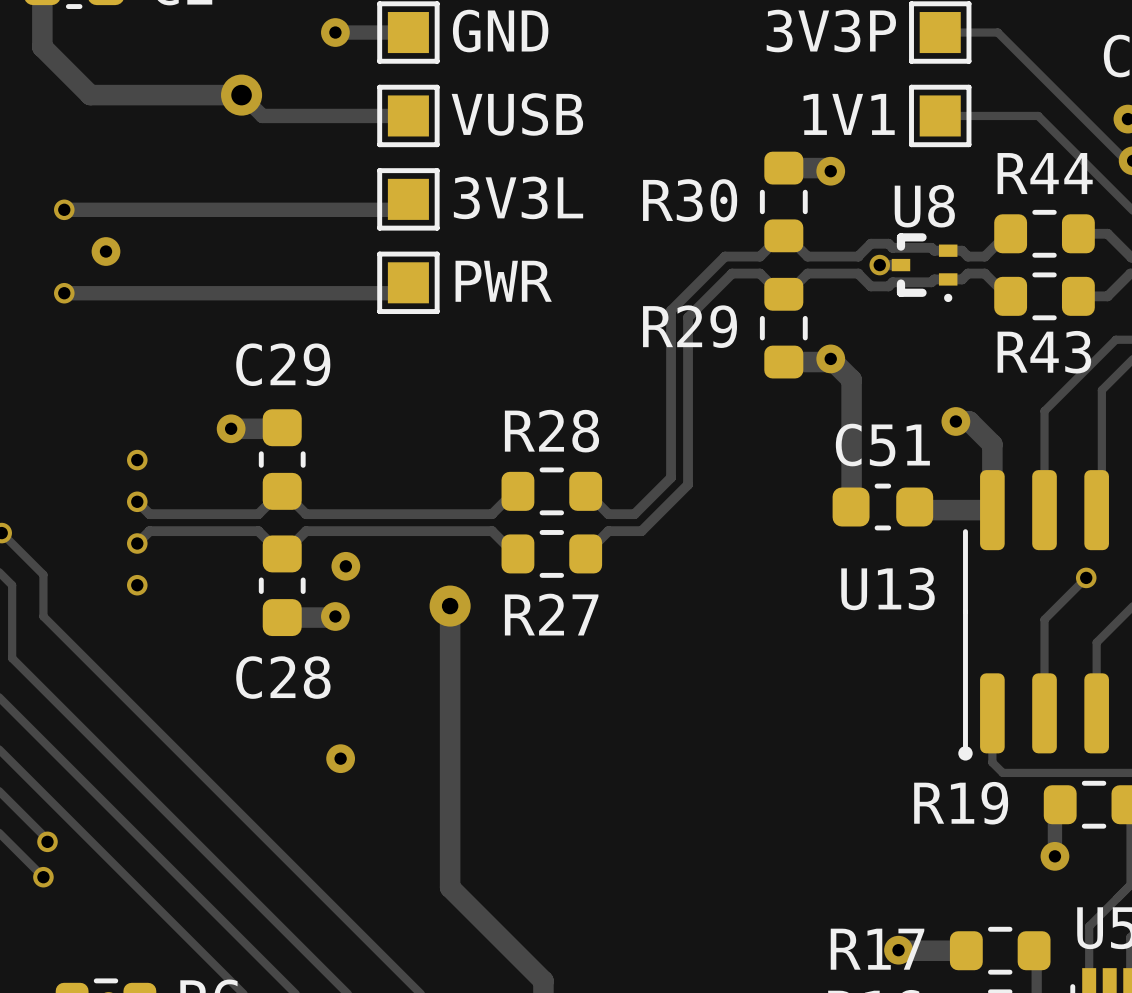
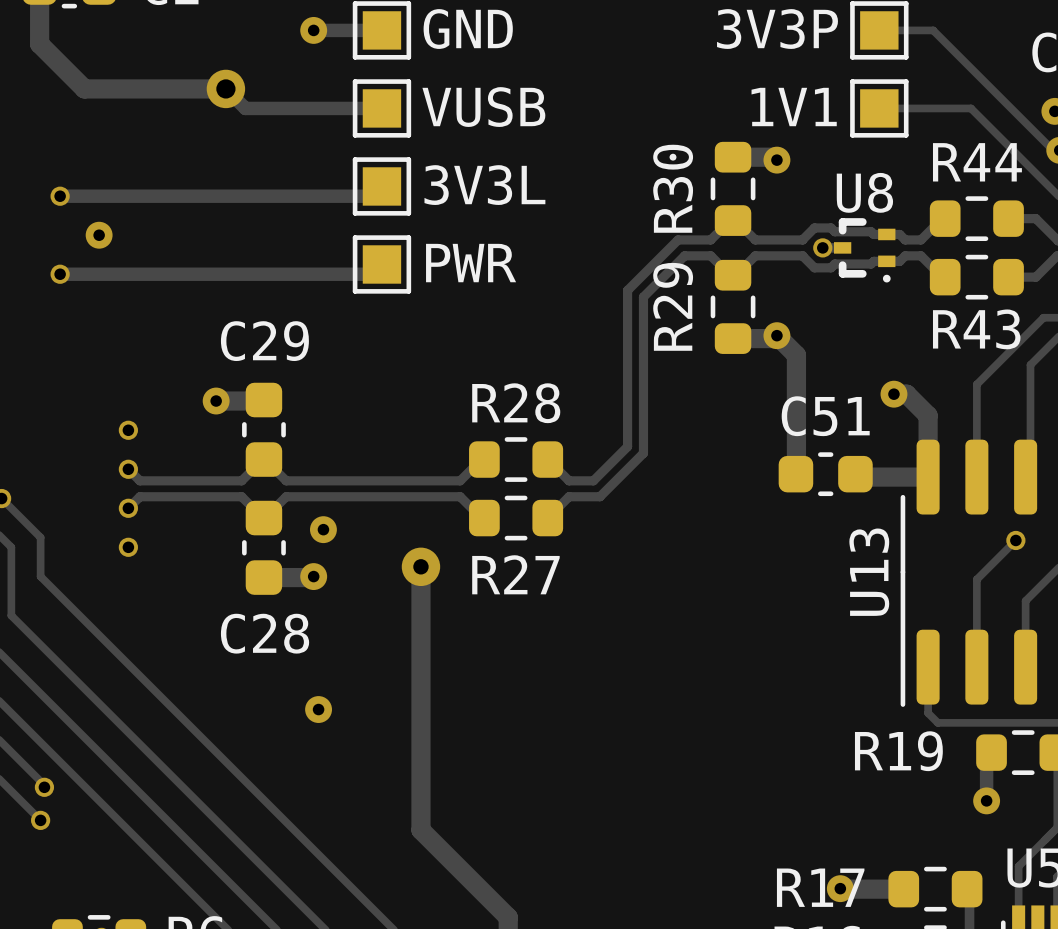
R30 name rotation: 0° (690, 200) -> 90° counterclockwise (673, 188)
R29 name rotation: 0° (690, 326) -> 90° counterclockwise (673, 306)
U13 name rotation: 0° (888, 588) -> 90° counterclockwise (869, 572)
drawing: [958, 746, 973, 761] -> none

